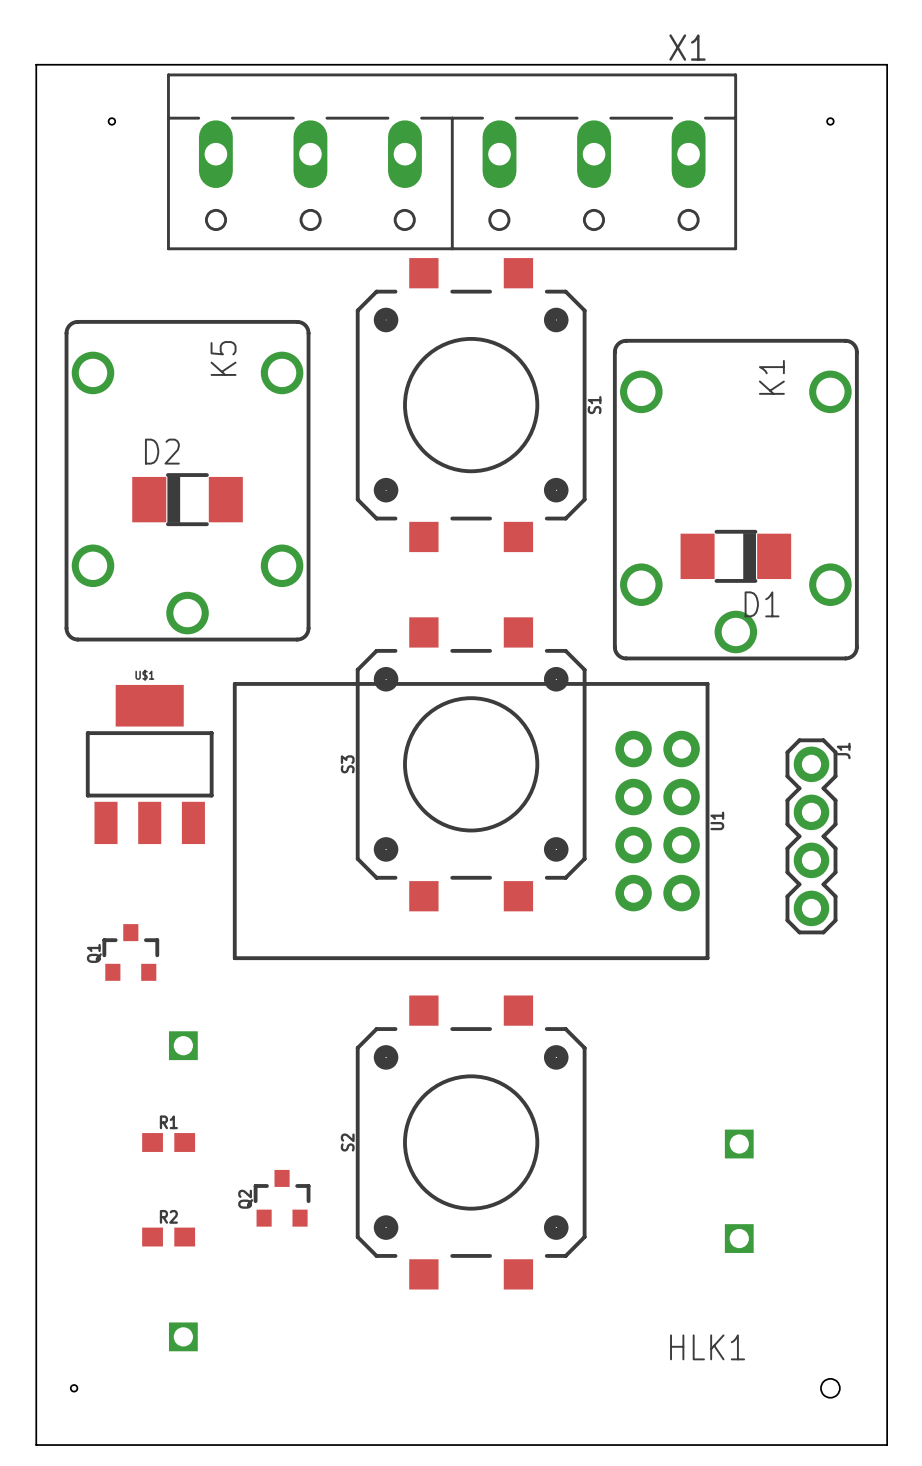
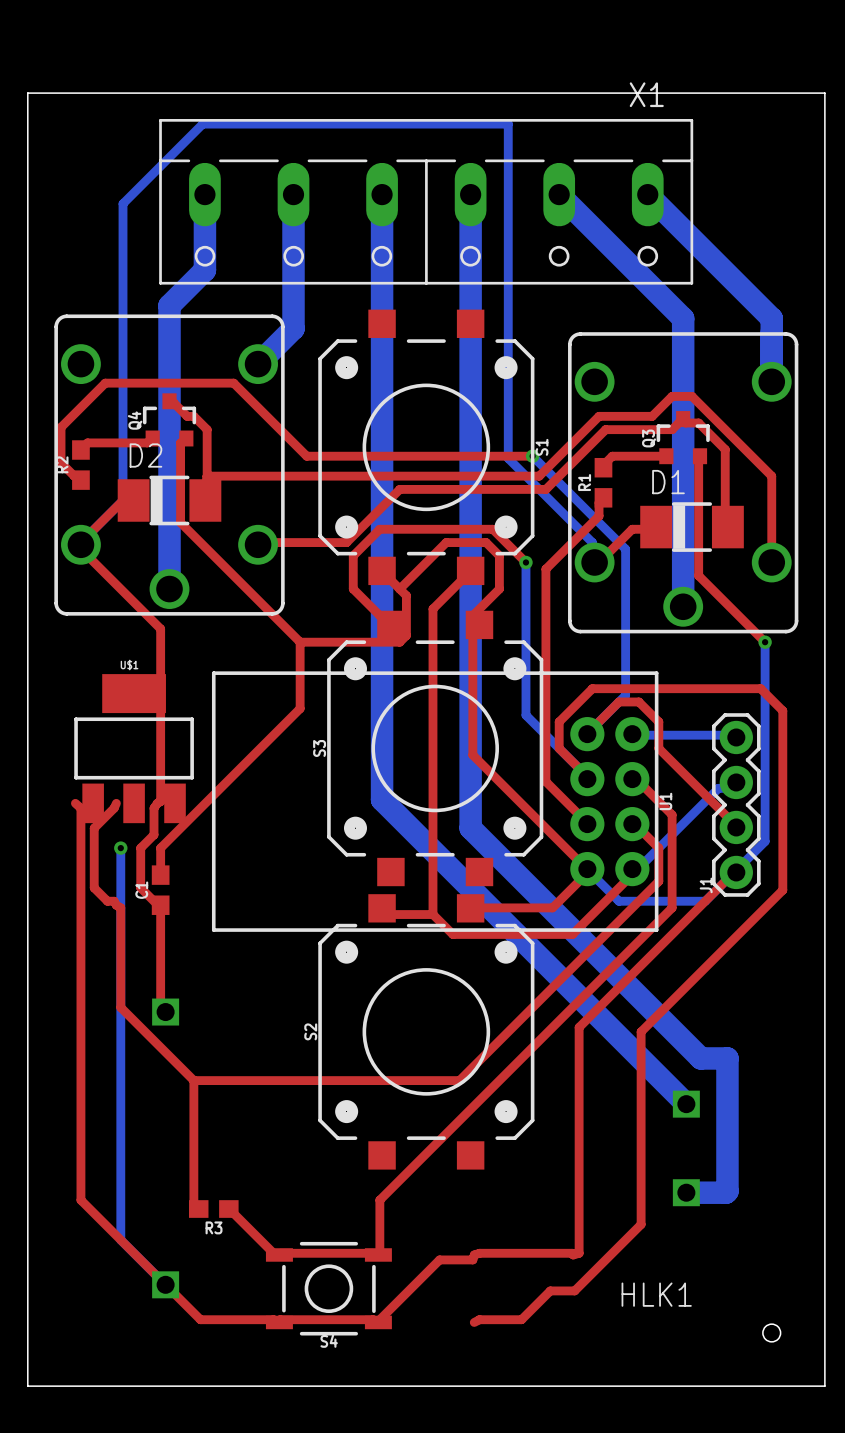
hole: (111, 121) -> none
hole: (830, 121) -> none
X1 position: (452, 161) -> (426, 201)
bottom track: none -> (204, 194) (204, 270) (169, 305) (169, 589)
bottom track: none -> (293, 194) (293, 328) (258, 364)
bottom track: none -> (382, 194) (382, 799) (686, 1104)
bottom track: none -> (470, 194) (470, 828) (700, 1058) (727, 1058) (727, 1191) (686, 1192)
bottom track: none -> (559, 194) (683, 318) (683, 606)
bottom track: none -> (647, 194) (771, 318) (771, 381)
K5 name: K5 (223, 358) -> none
K1 name: K1 (771, 377) -> none
top track: none -> (169, 401) (173, 403) (187, 416) (193, 416) (207, 429) (207, 489) (205, 491) (207, 476) (539, 476) (599, 416) (652, 416) (672, 396) (692, 396) (771, 476) (771, 562)
S1 position: (471, 405) -> (426, 447)
Q4: none -> (169, 419)
Q3: none -> (683, 437)
top track: none -> (152, 438) (147, 442) (87, 442) (80, 450)
top track: none -> (186, 438) (180, 442) (180, 522) (300, 642)
top track: none -> (532, 456) (306, 456) (233, 383) (105, 383) (61, 427) (61, 462) (74, 476) (80, 476) (80, 480)
bottom track: none -> (532, 456) (625, 549) (625, 695) (587, 734)
via: none -> (532, 456)
top track: none -> (666, 456) (612, 456) (603, 467)
top track: none -> (700, 456) (698, 575) (765, 642)
K5 position: (187, 480) -> (169, 465)
top track: none -> (133, 491) (80, 542) (80, 549) (160, 628) (160, 801) (154, 808) (154, 834) (140, 848) (140, 887) (160, 907)
top track: none -> (603, 497) (599, 502) (599, 515) (545, 569) (545, 781) (587, 824)
K1 position: (735, 499) -> (683, 482)
top track: none -> (656, 527) (652, 529) (632, 529) (599, 562) (594, 562)
top track: none -> (727, 527) (725, 522) (725, 449) (698, 423) (685, 423) (683, 419) (672, 429) (605, 429) (545, 489) (399, 489) (346, 542) (260, 542) (258, 544)
bottom track: none -> (80, 544) (80, 542) (123, 500) (123, 203) (202, 124) (508, 124) (508, 458) (592, 542) (592, 562) (594, 562)
D1 rotation: 0° (735, 556) -> 180° (692, 527)
top track: none -> (525, 562) (492, 529) (379, 529) (353, 555) (353, 589) (382, 616)
bottom track: none -> (525, 562) (525, 715) (585, 775) (587, 779)
via: none -> (525, 562)
top track: none -> (382, 570) (406, 595) (406, 635) (399, 642) (300, 642)
top track: none -> (470, 570) (432, 608) (432, 914)
top track: none -> (399, 589) (446, 542) (486, 542) (499, 555) (499, 589) (470, 616) (472, 622) (472, 755) (587, 869) (585, 874) (552, 907) (470, 908)
top track: none -> (300, 642) (300, 708) (160, 848) (160, 875)
bottom track: none -> (765, 642) (765, 841) (736, 872) (705, 901) (618, 901) (587, 869)
via: none -> (765, 642)
top track: none -> (587, 734) (618, 701) (638, 701) (658, 721) (658, 748) (736, 827)
bottom track: none -> (632, 734) (731, 735) (736, 737)
J1 name position: J1 (843, 750) -> J1 (706, 885)
top track: none -> (587, 779) (585, 775) (559, 748) (559, 721) (592, 688) (760, 688) (782, 710) (782, 890) (641, 1031) (641, 1224) (574, 1290) (550, 1290) (521, 1319) (479, 1319) (474, 1322)
top track: none -> (632, 779) (638, 781) (672, 814) (672, 907) (379, 1200) (378, 1254) (373, 1253) (280, 1253) (279, 1254) (273, 1253) (228, 1209)
bottom track: none -> (736, 782) (731, 788) (718, 788) (638, 868) (632, 869)
top track: none -> (75, 803) (80, 808) (80, 1200) (200, 1319) (273, 1319) (279, 1322) (280, 1319) (373, 1319) (378, 1322) (439, 1259) (472, 1259) (474, 1254) (479, 1253) (572, 1253) (573, 1254) (579, 1253) (579, 1027) (731, 874) (736, 872)
top track: none -> (116, 803) (114, 808) (94, 828) (94, 887) (107, 901) (114, 901) (120, 907) (120, 1007) (193, 1080)
J1 position: (811, 836) -> (736, 804)
top track: none -> (632, 824) (658, 848) (658, 881) (459, 1080) (193, 1080)
bottom track: none -> (120, 848) (120, 1240) (165, 1284)
via: none -> (120, 848)
top track: none -> (632, 869) (632, 874) (572, 934) (452, 934) (432, 914)
C1: none -> (160, 890)
top track: none -> (160, 905) (160, 1007) (165, 1012)
top track: none -> (382, 908) (386, 914) (432, 914)
Q1: (130, 952) -> none
top track: none -> (193, 1080) (193, 1206) (198, 1209)
R1 rotation: 0° (168, 1142) -> 90° clockwise (603, 482)
R1 position: (168, 1142) -> (603, 482)
S2 position: (471, 1142) -> (426, 1031)
Q2: (282, 1198) -> none
R2 rotation: 0° (168, 1237) -> 90° clockwise (80, 465)
R2 position: (168, 1237) -> (80, 465)
R3: none -> (213, 1209)
S4: none -> (328, 1288)
hole: (74, 1388) -> none

